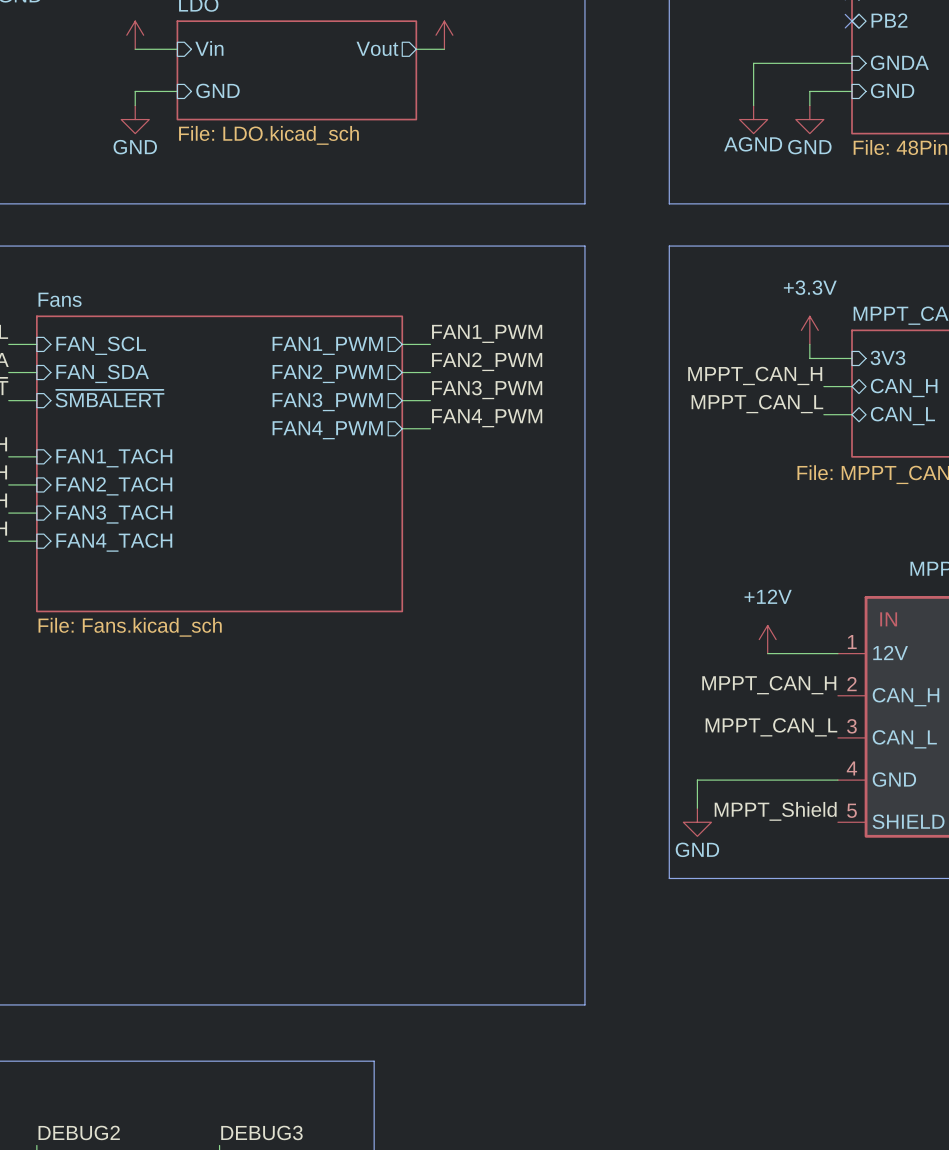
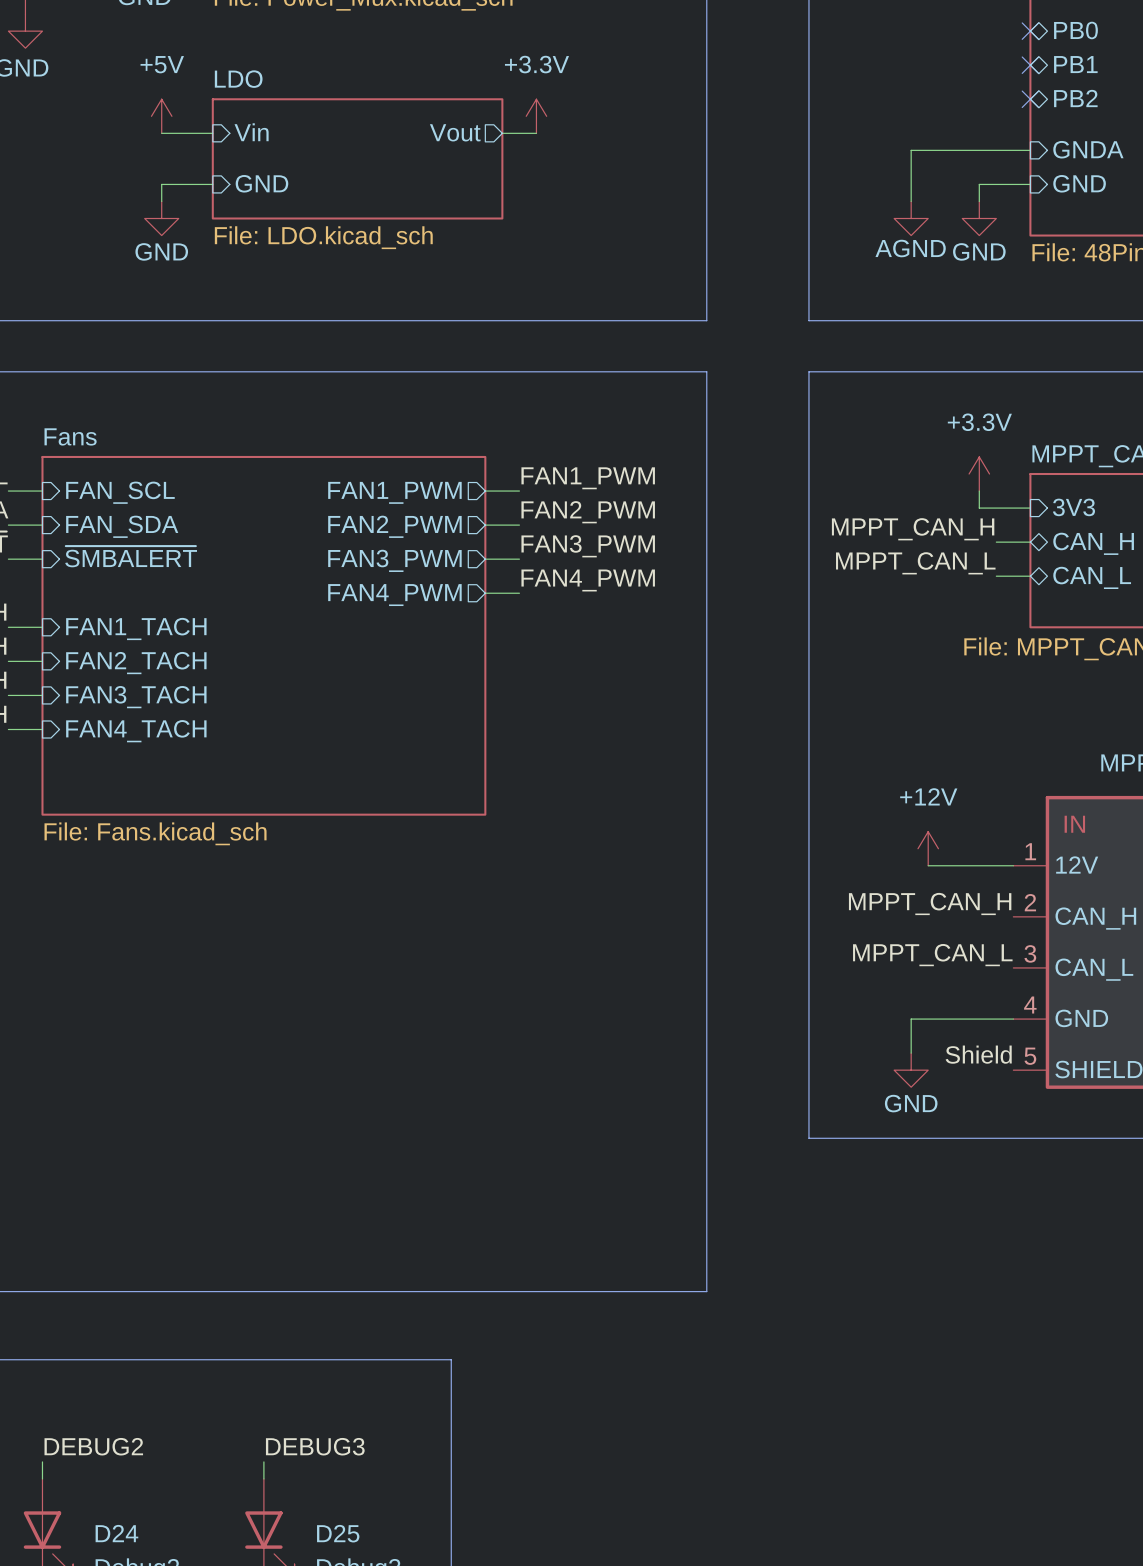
wire: (753, 780) (697, 780) (697, 808) -> (911, 1019) (911, 1053)
label: MPPT_Shield (775, 811) -> Shield (978, 1054)
power symbol position: GND (697, 822) -> GND (911, 1070)

